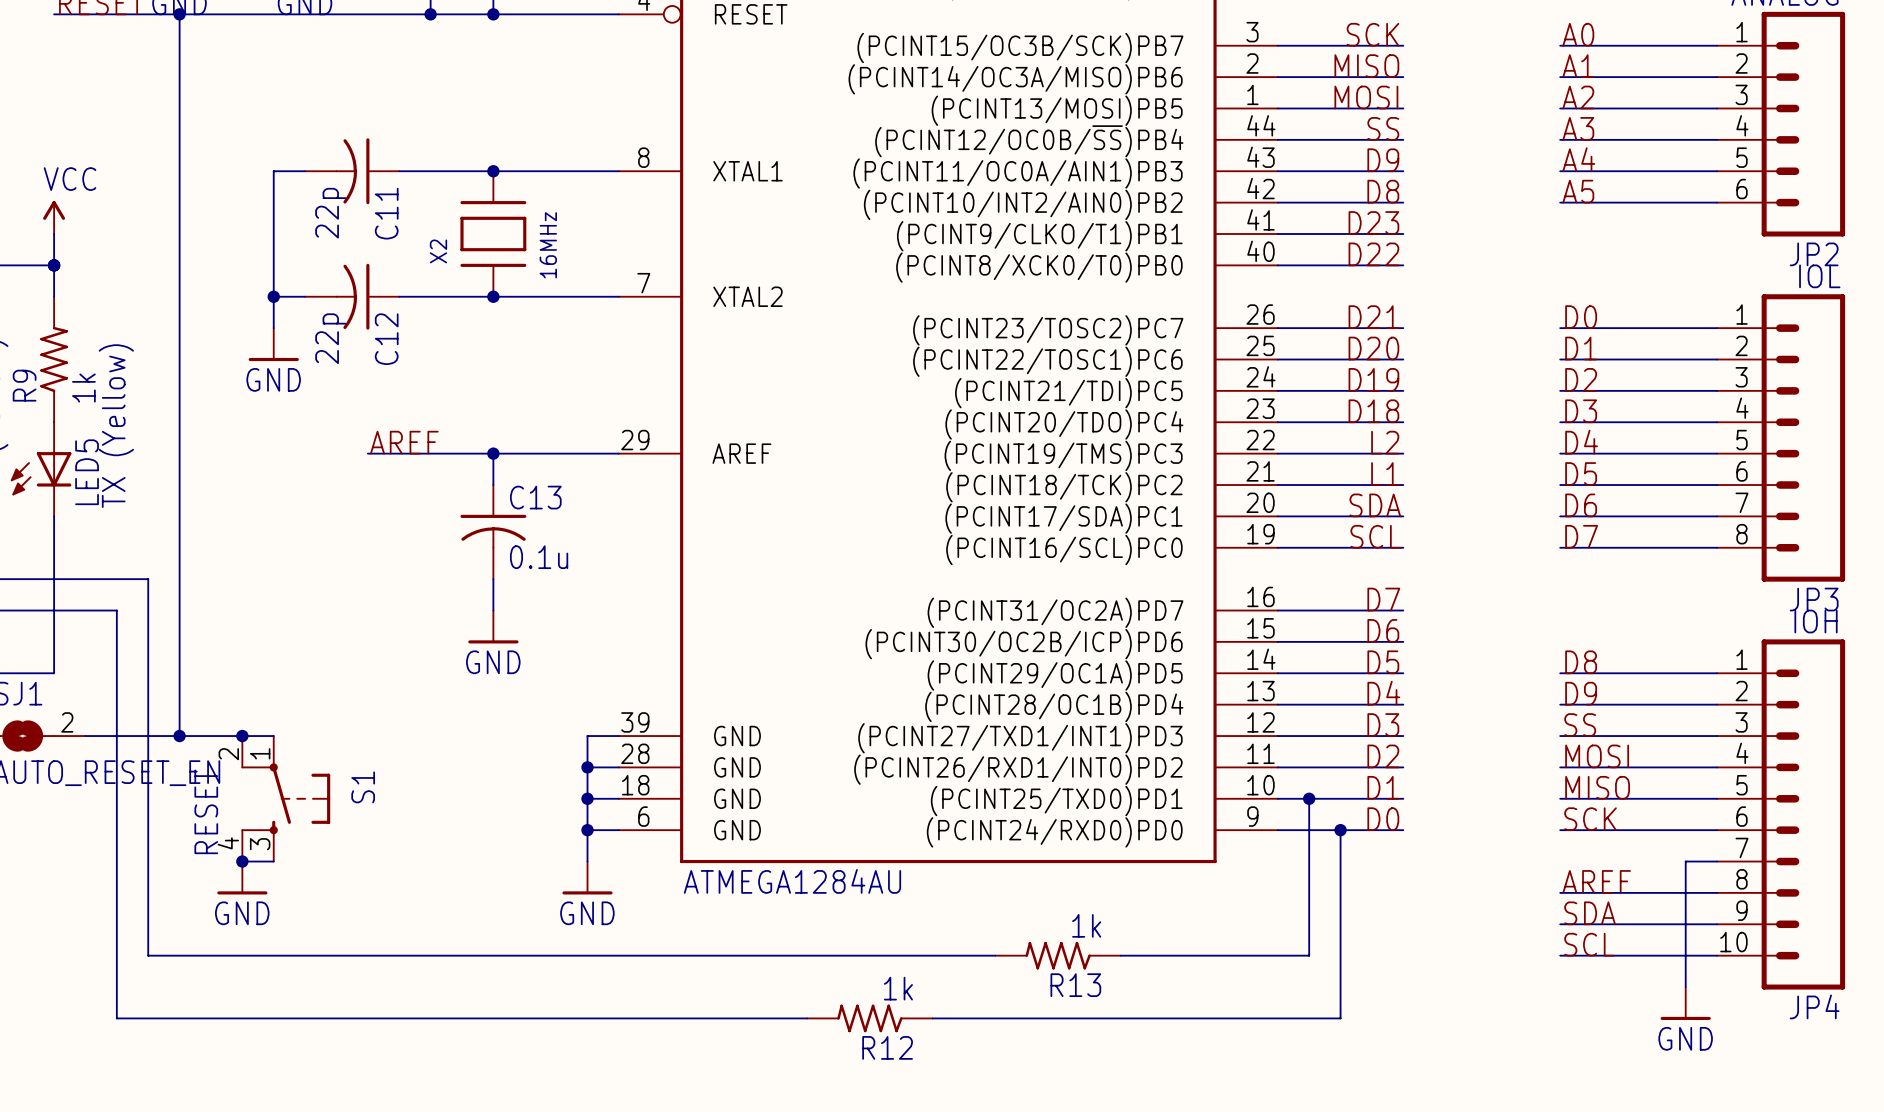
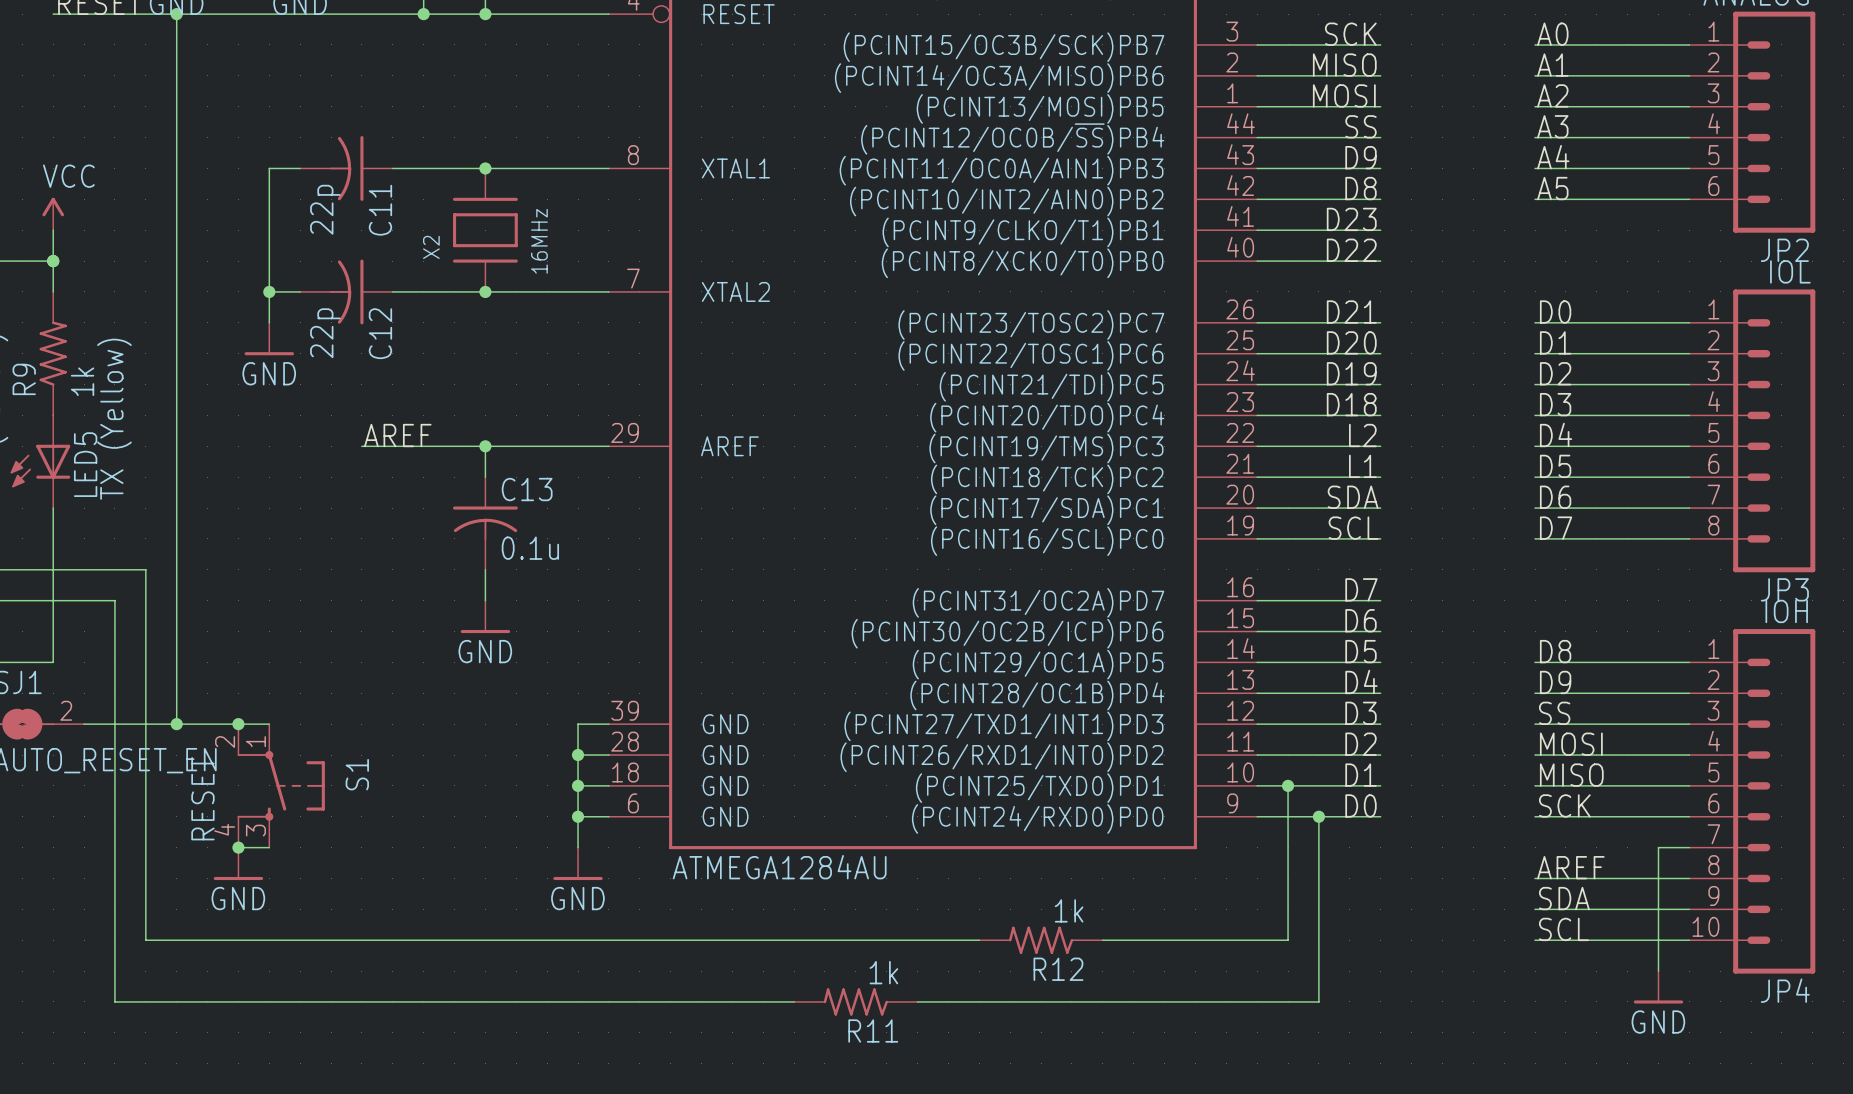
R13 name: R13 (1075, 985) -> R12 (1058, 969)
R12 name: R12 (887, 1047) -> R11 (873, 1030)

